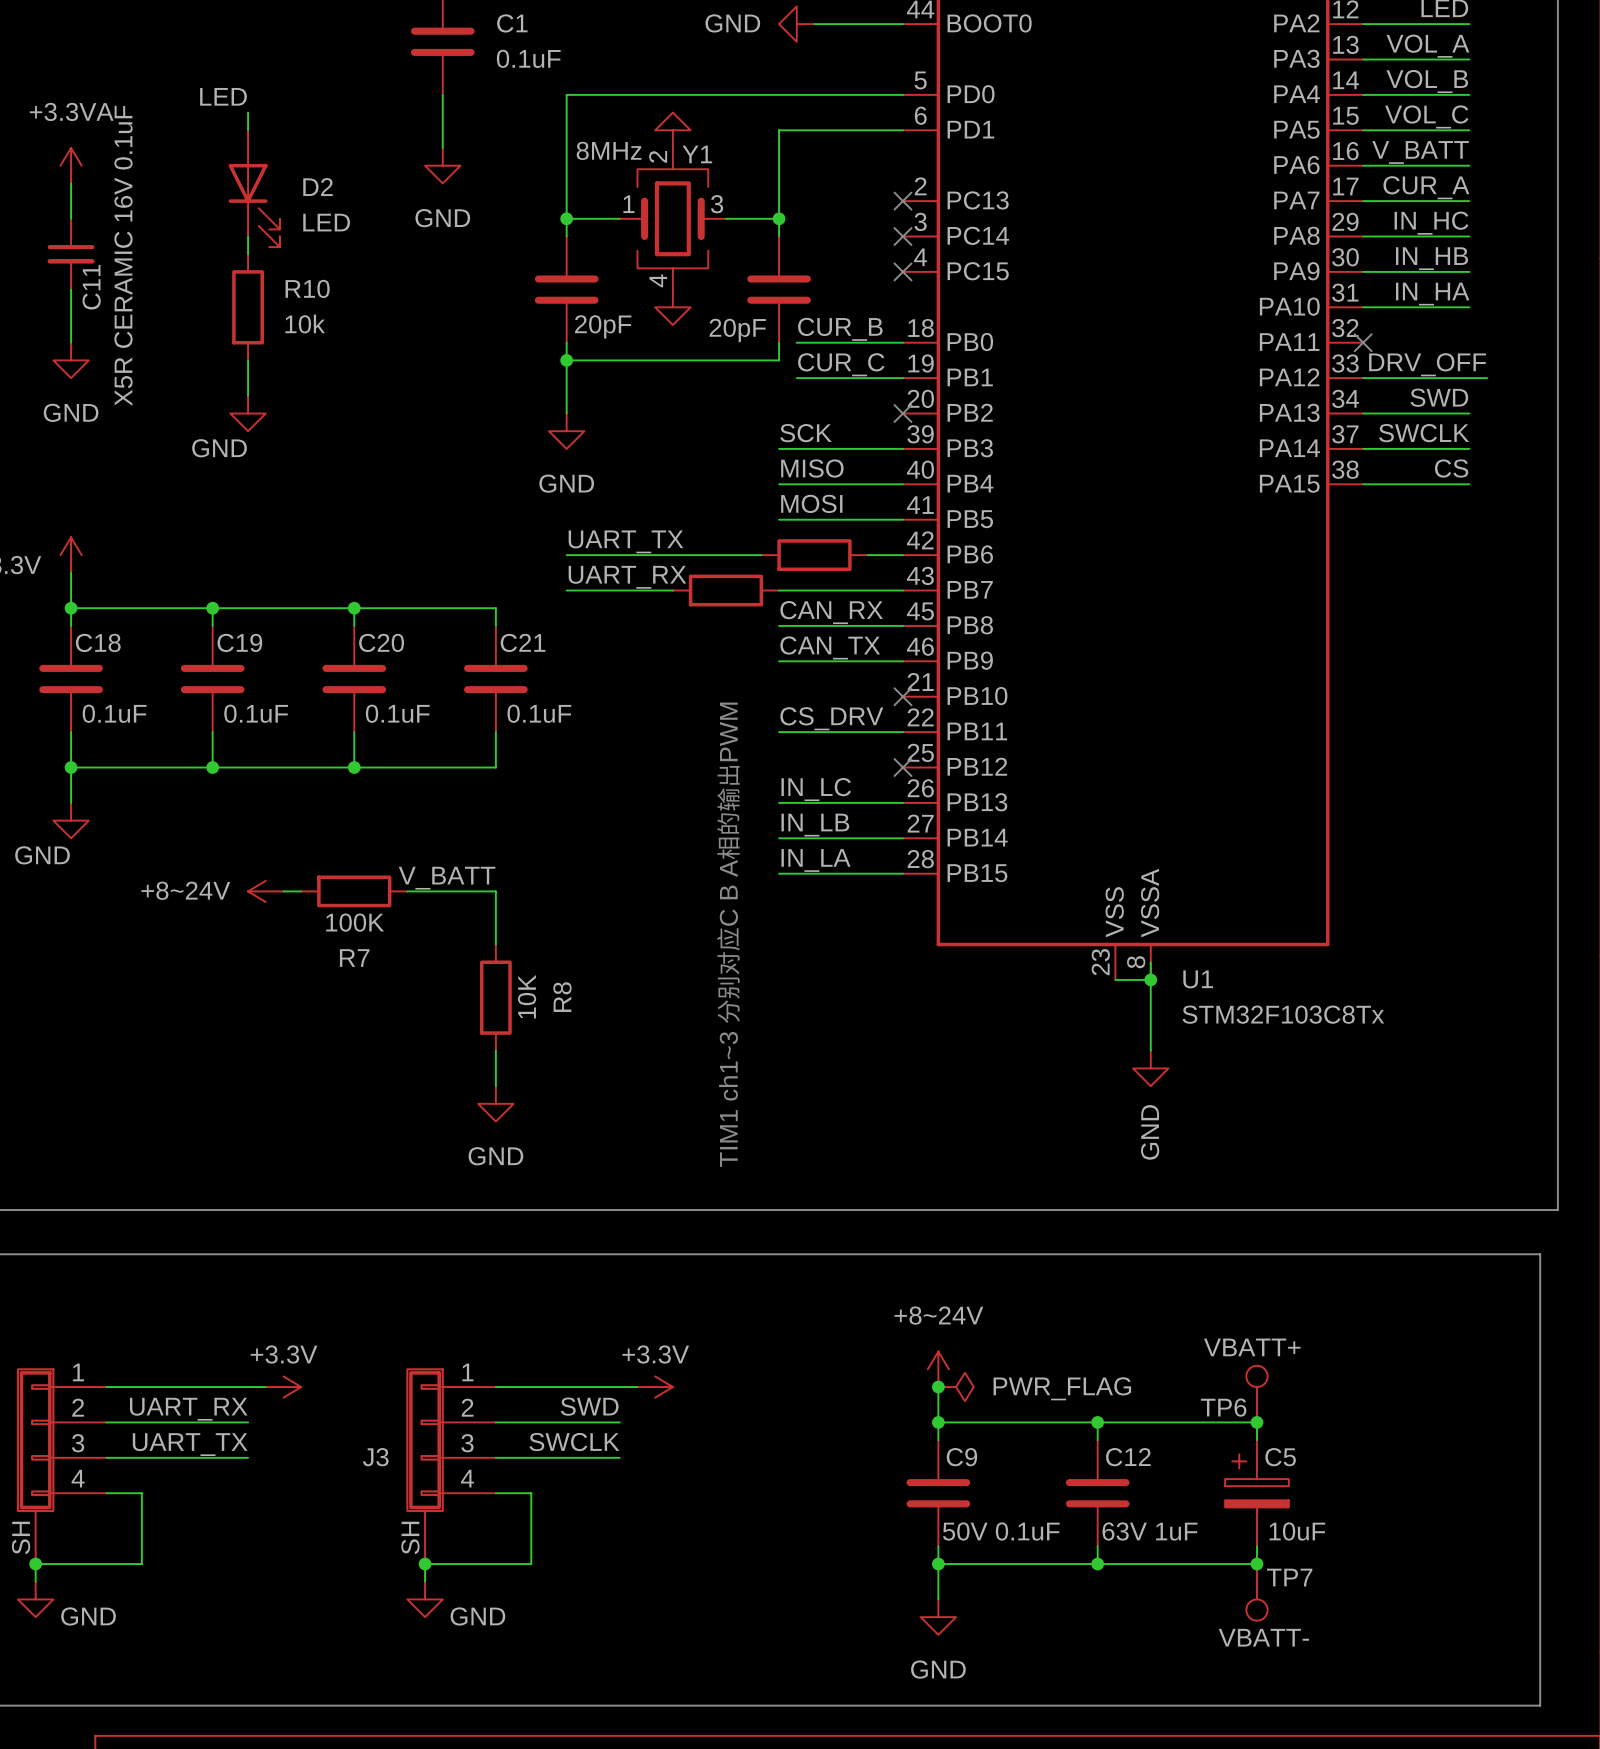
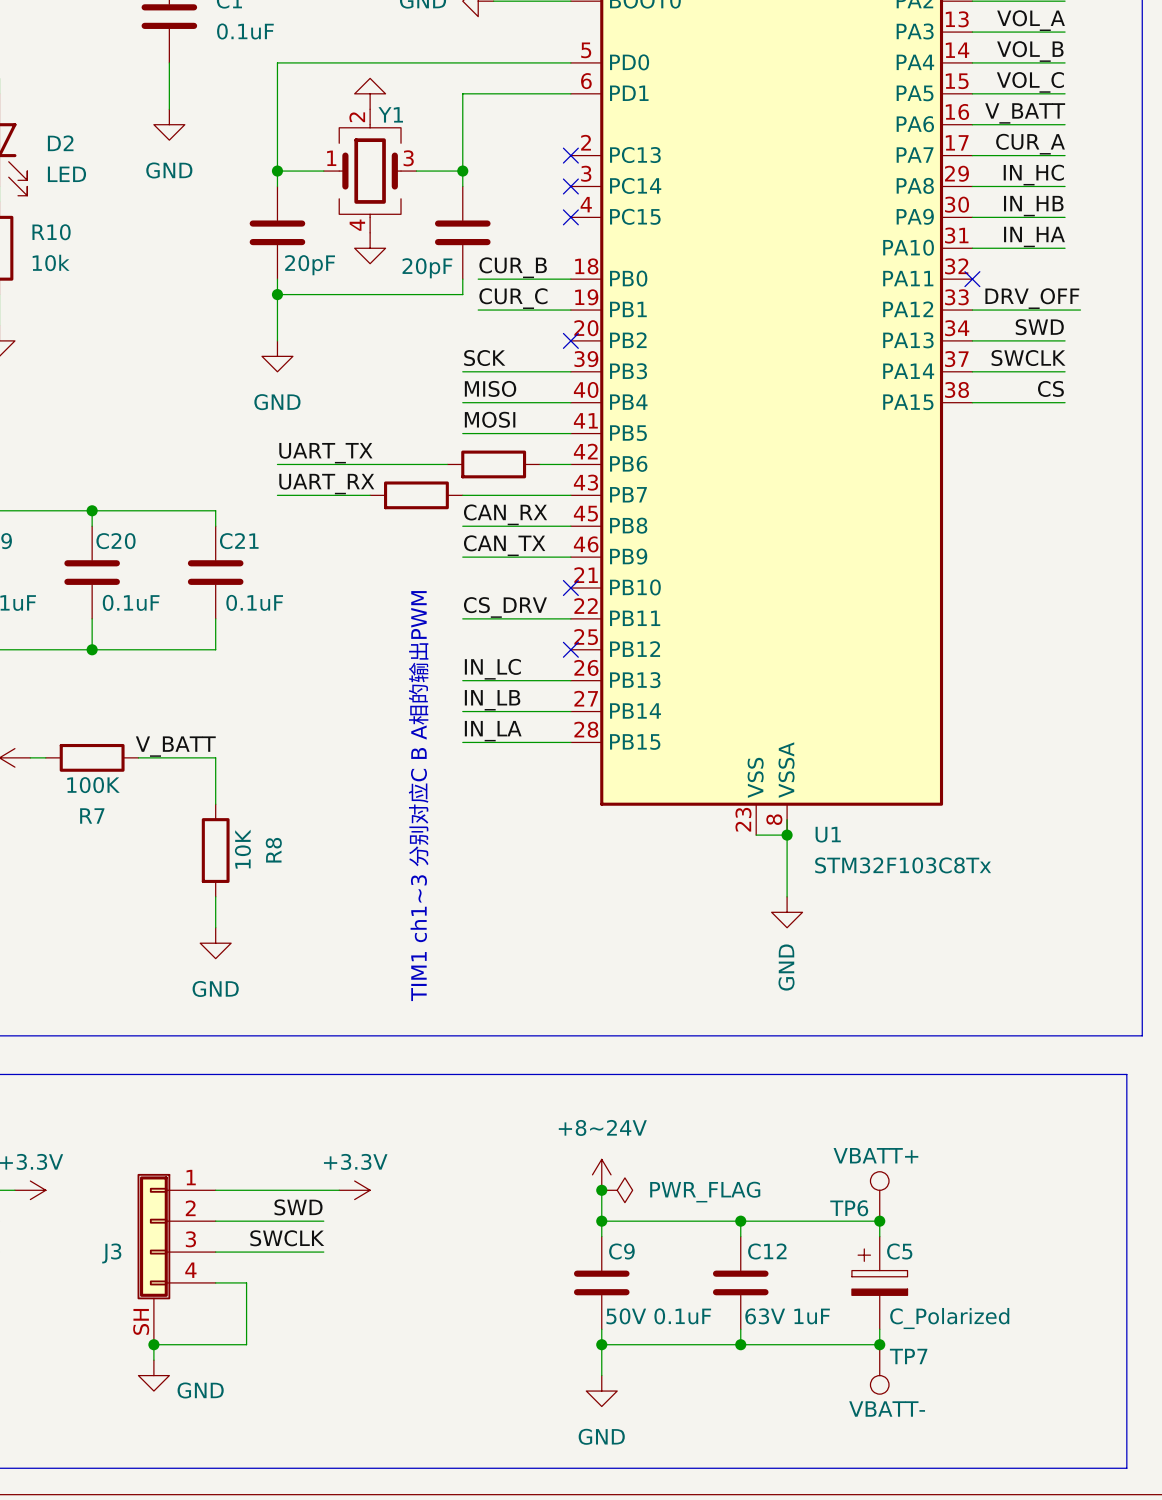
Y1 value: 8MHz (609, 150) -> none
C5 value: 10uF (1297, 1531) -> C_Polarized (949, 1318)

